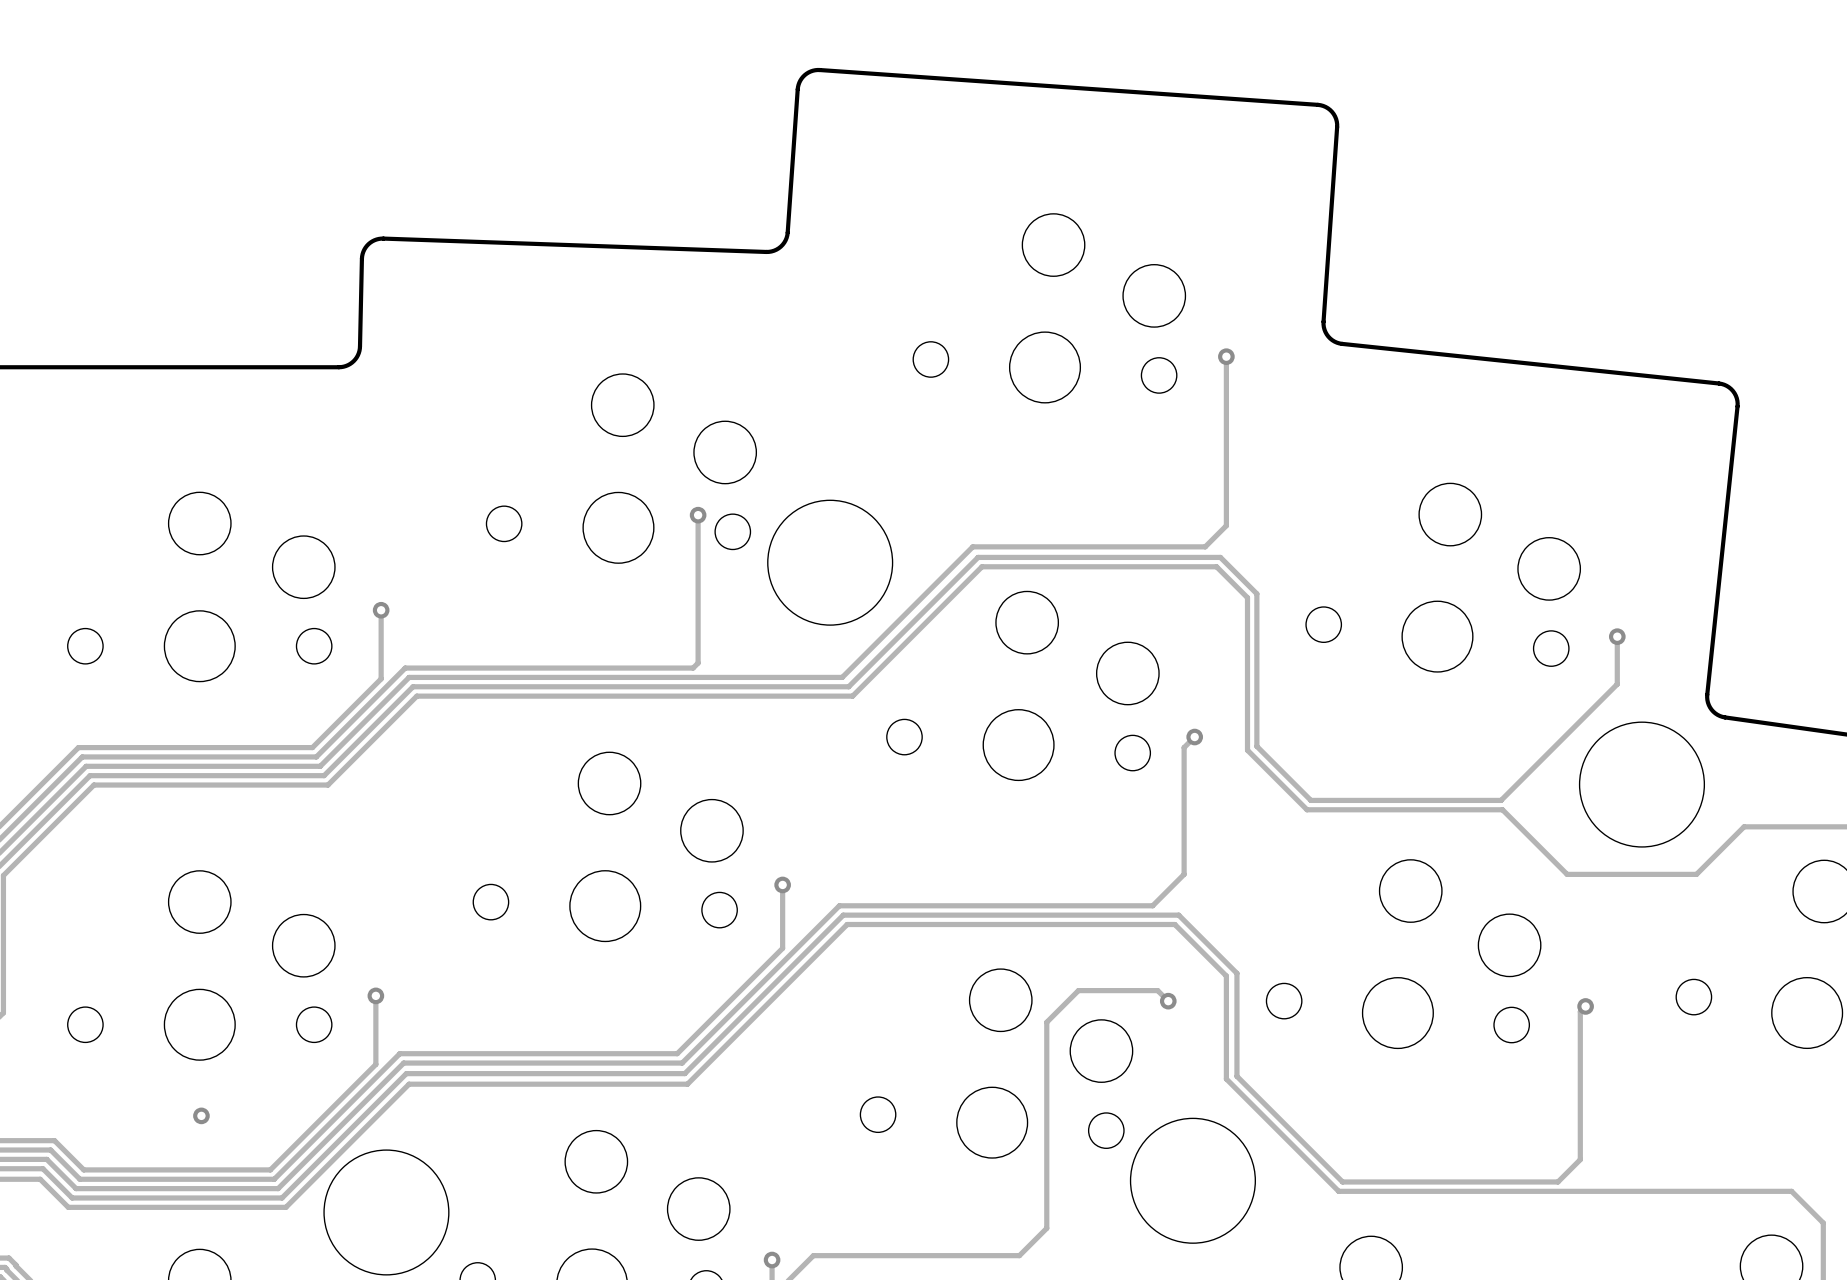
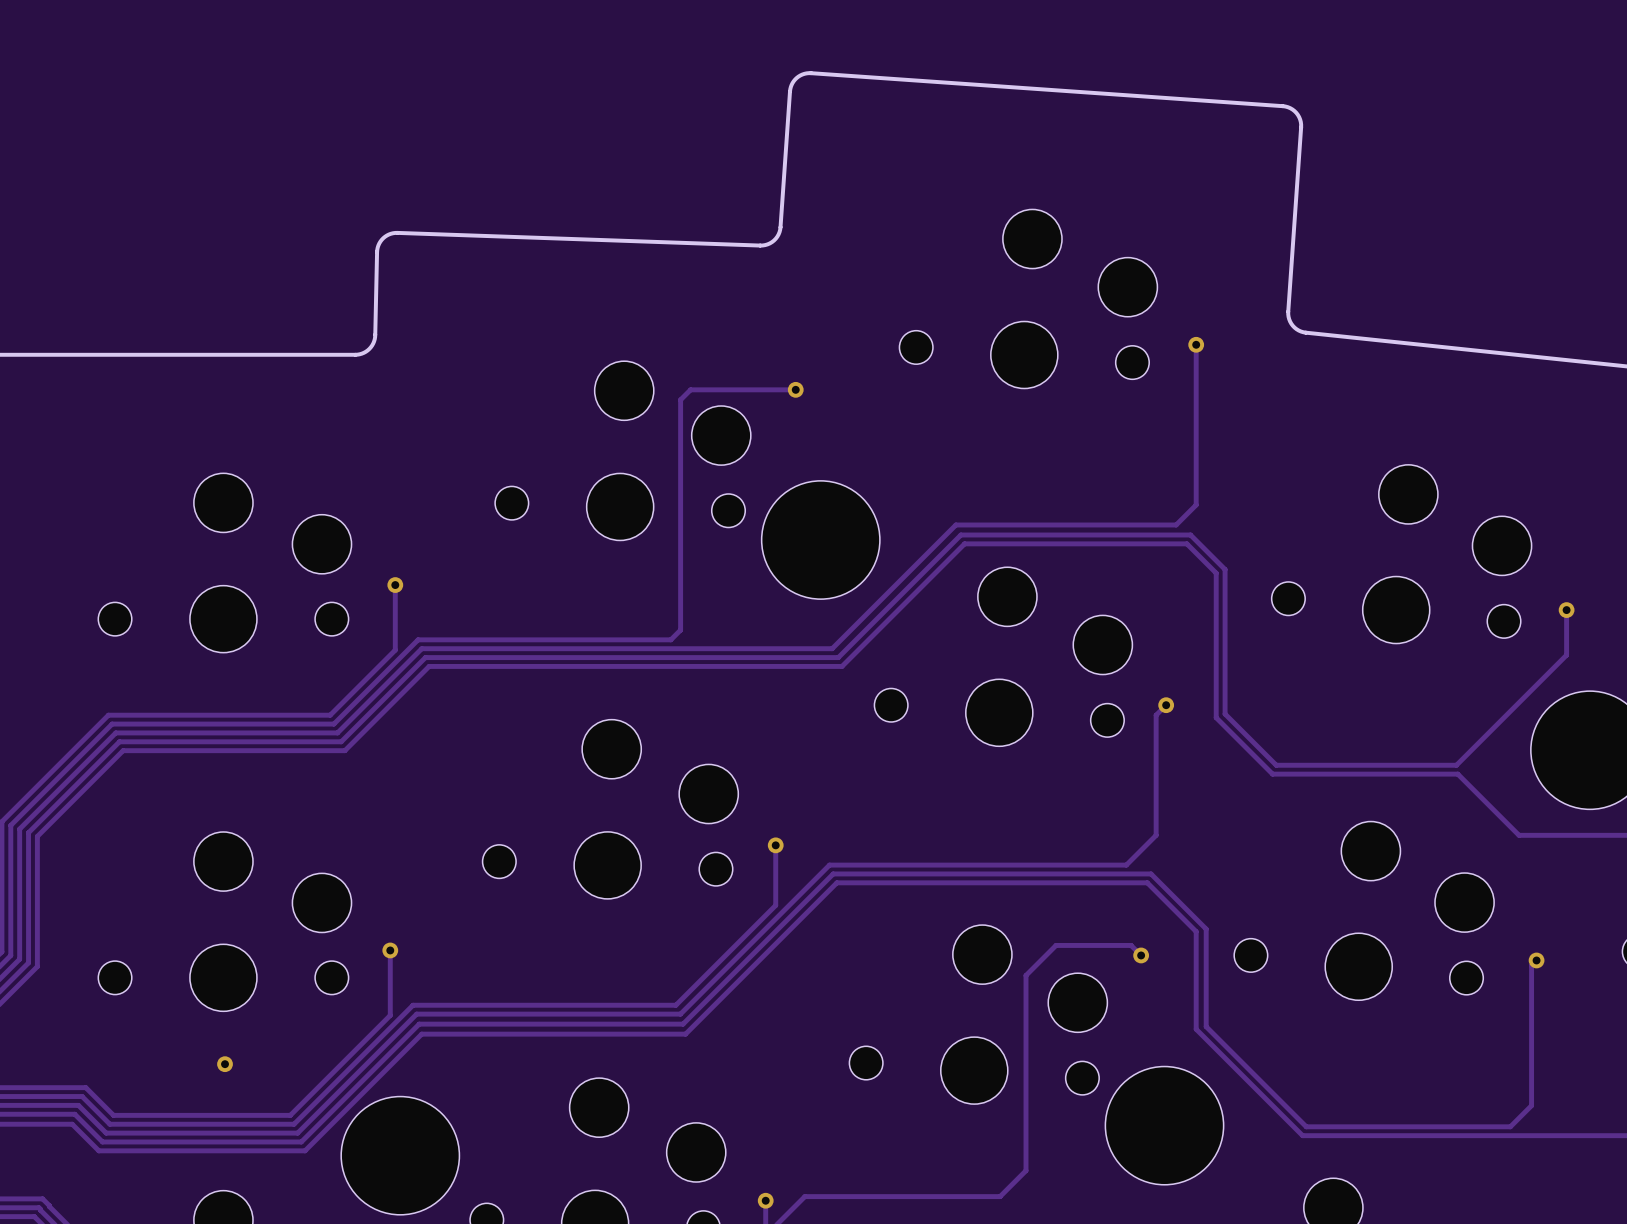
via: none -> (795, 389)
track: (698, 515) (698, 663) (693, 668) (671, 668) -> (795, 389) (690, 389) (680, 399) (680, 630) (670, 639)
via: (698, 515) -> none

